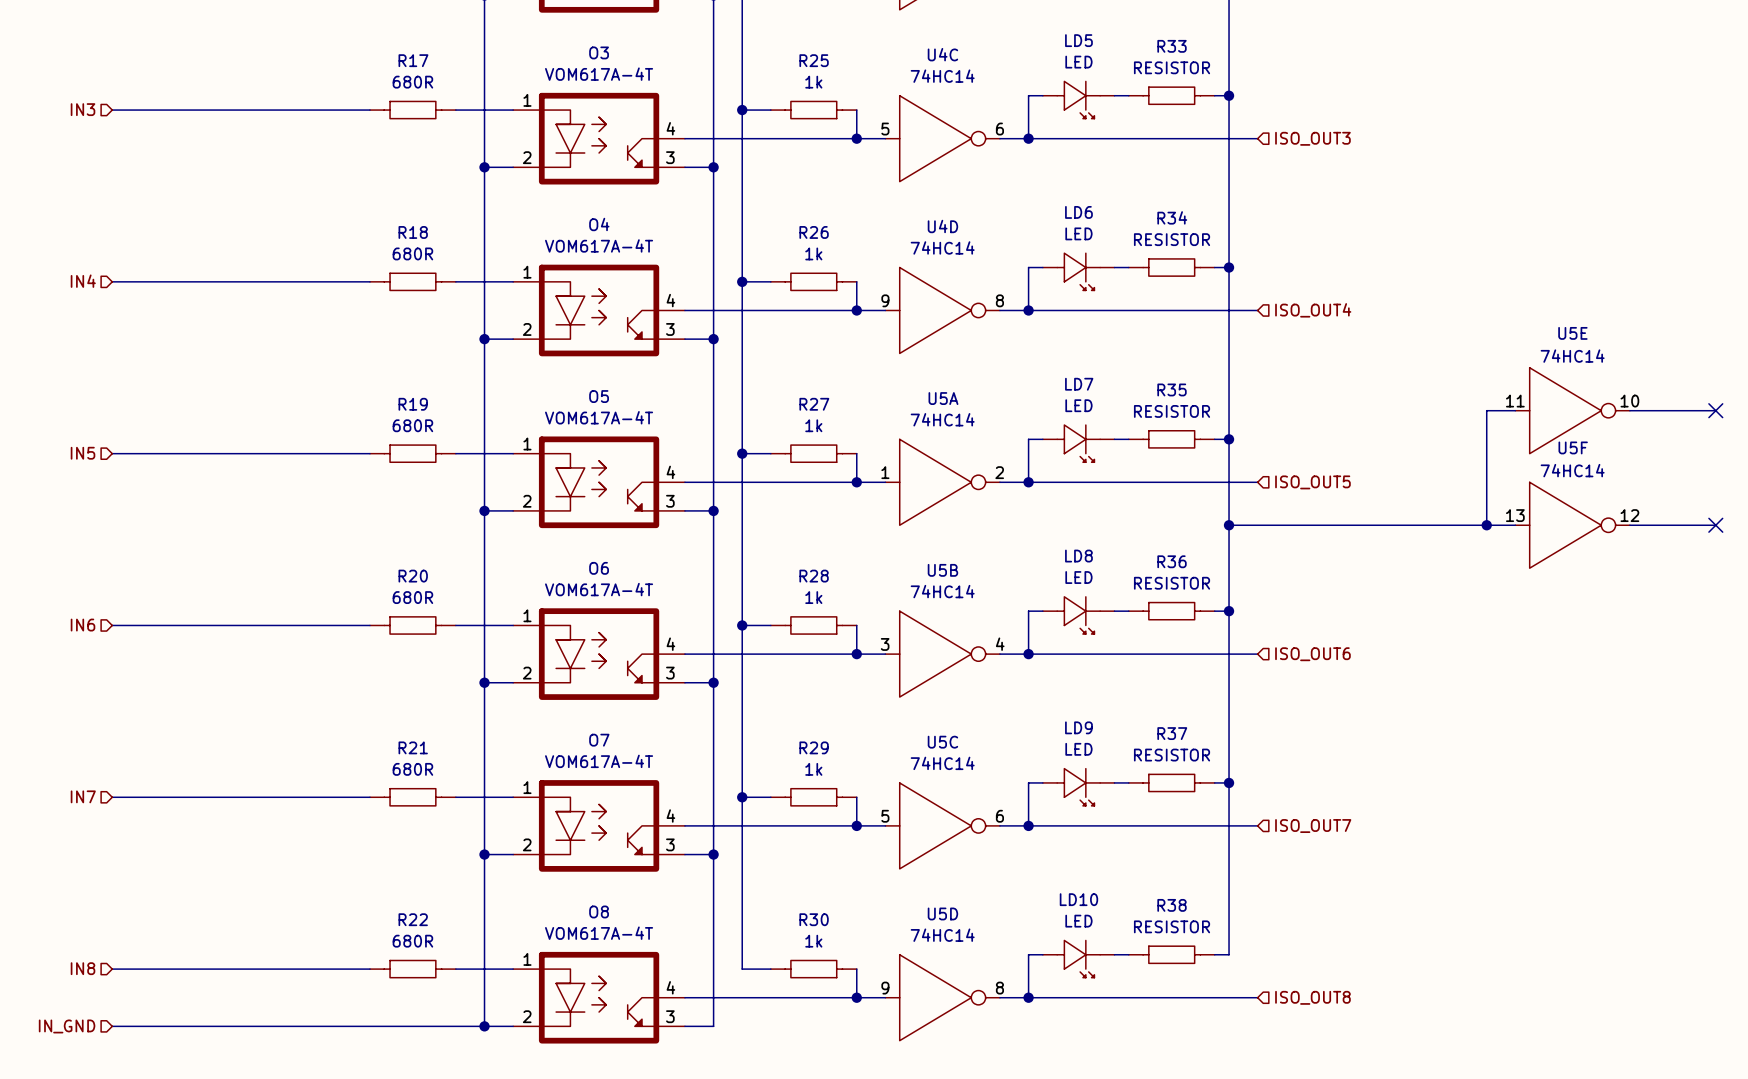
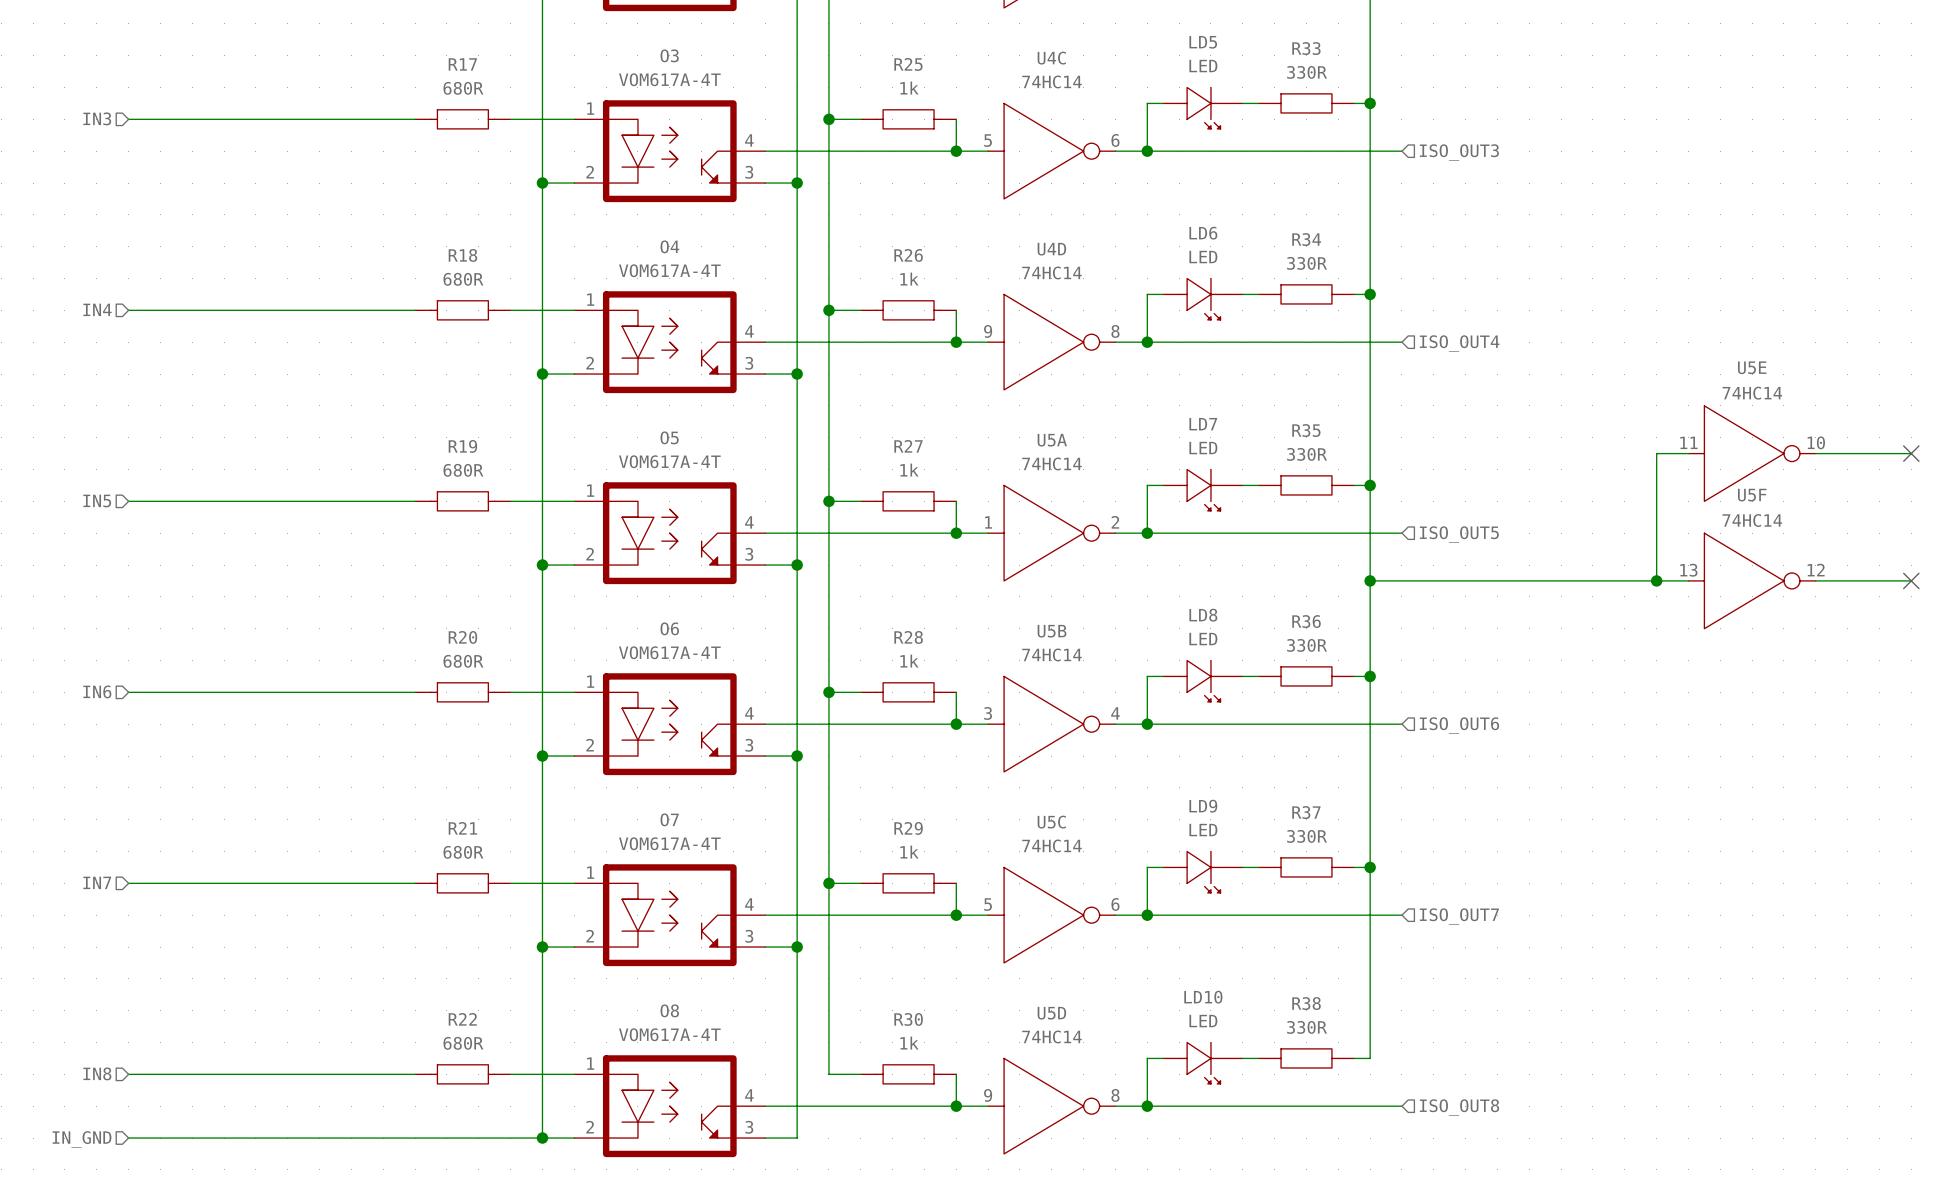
R33 value: RESISTOR (1172, 67) -> 330R (1307, 72)
R34 value: RESISTOR (1172, 239) -> 330R (1307, 263)
R35 value: RESISTOR (1172, 411) -> 330R (1307, 454)
R36 value: RESISTOR (1172, 583) -> 330R (1307, 645)
R37 value: RESISTOR (1172, 755) -> 330R (1307, 836)
R38 value: RESISTOR (1172, 926) -> 330R (1307, 1027)

